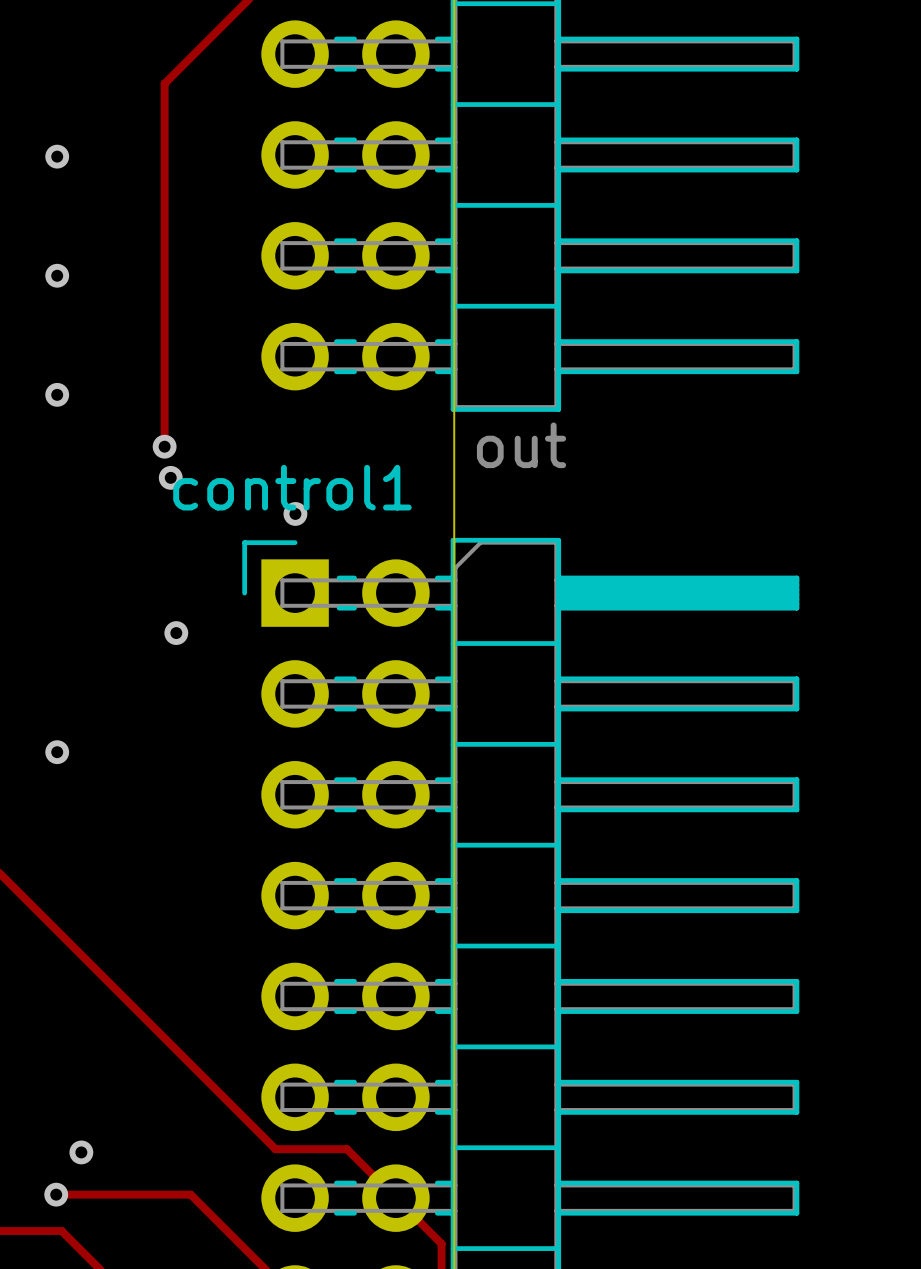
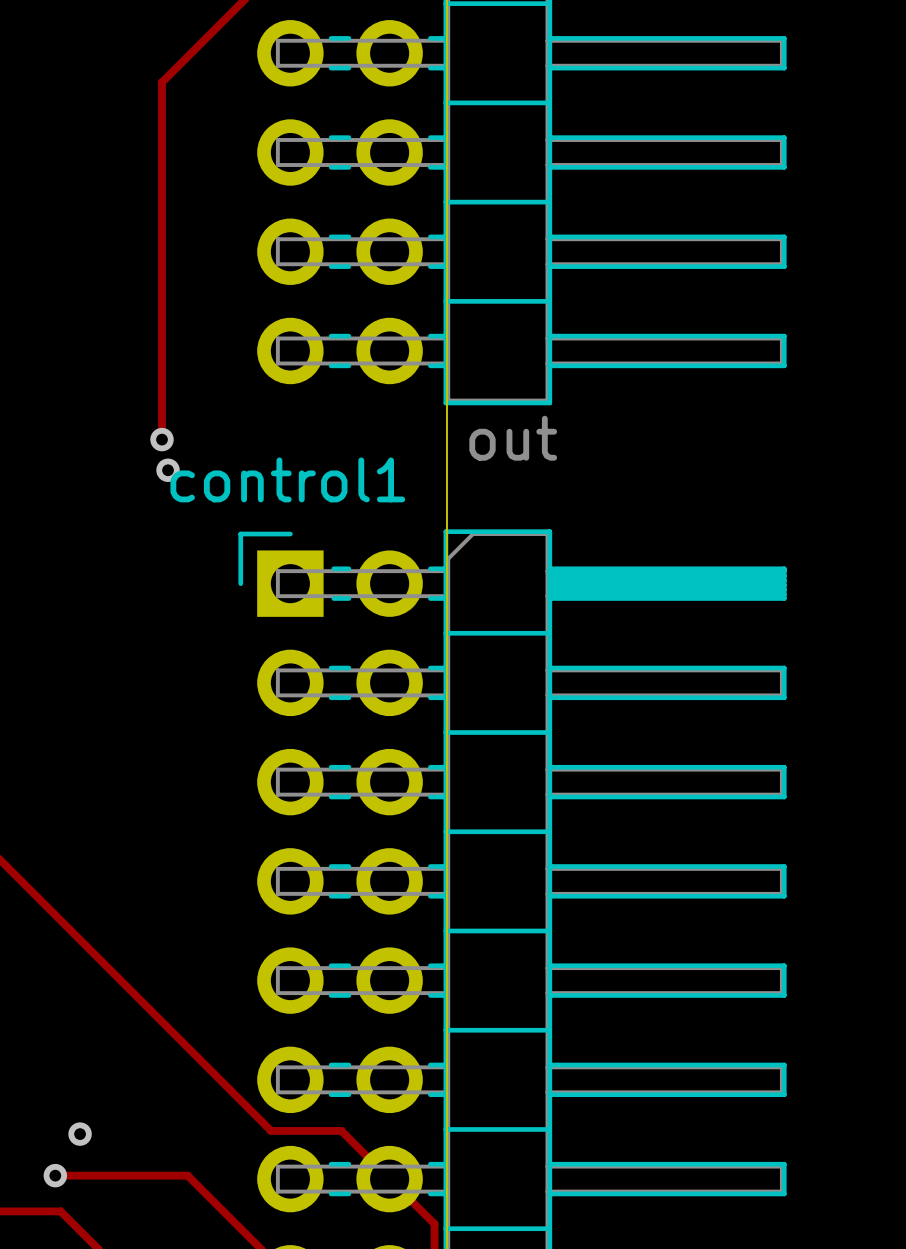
via: (57, 156) -> none
via: (57, 275) -> none
via: (57, 394) -> none
via: (295, 513) -> none
via: (176, 633) -> none
via: (57, 752) -> none

